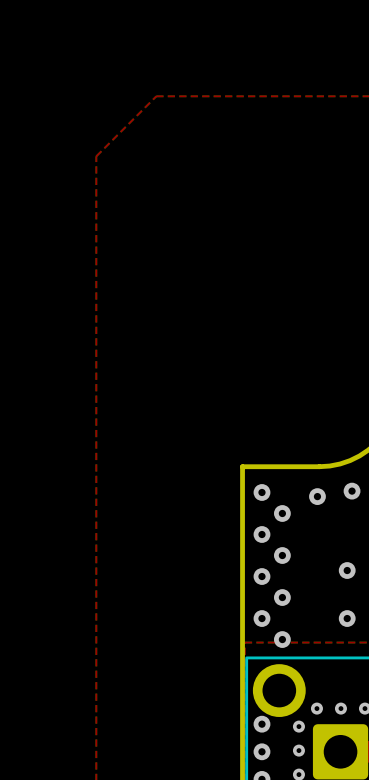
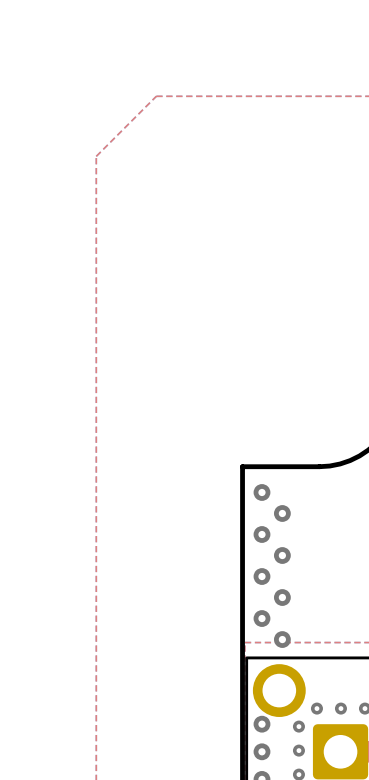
via: (352, 491) -> none
via: (317, 496) -> none
via: (347, 570) -> none
via: (347, 618) -> none

